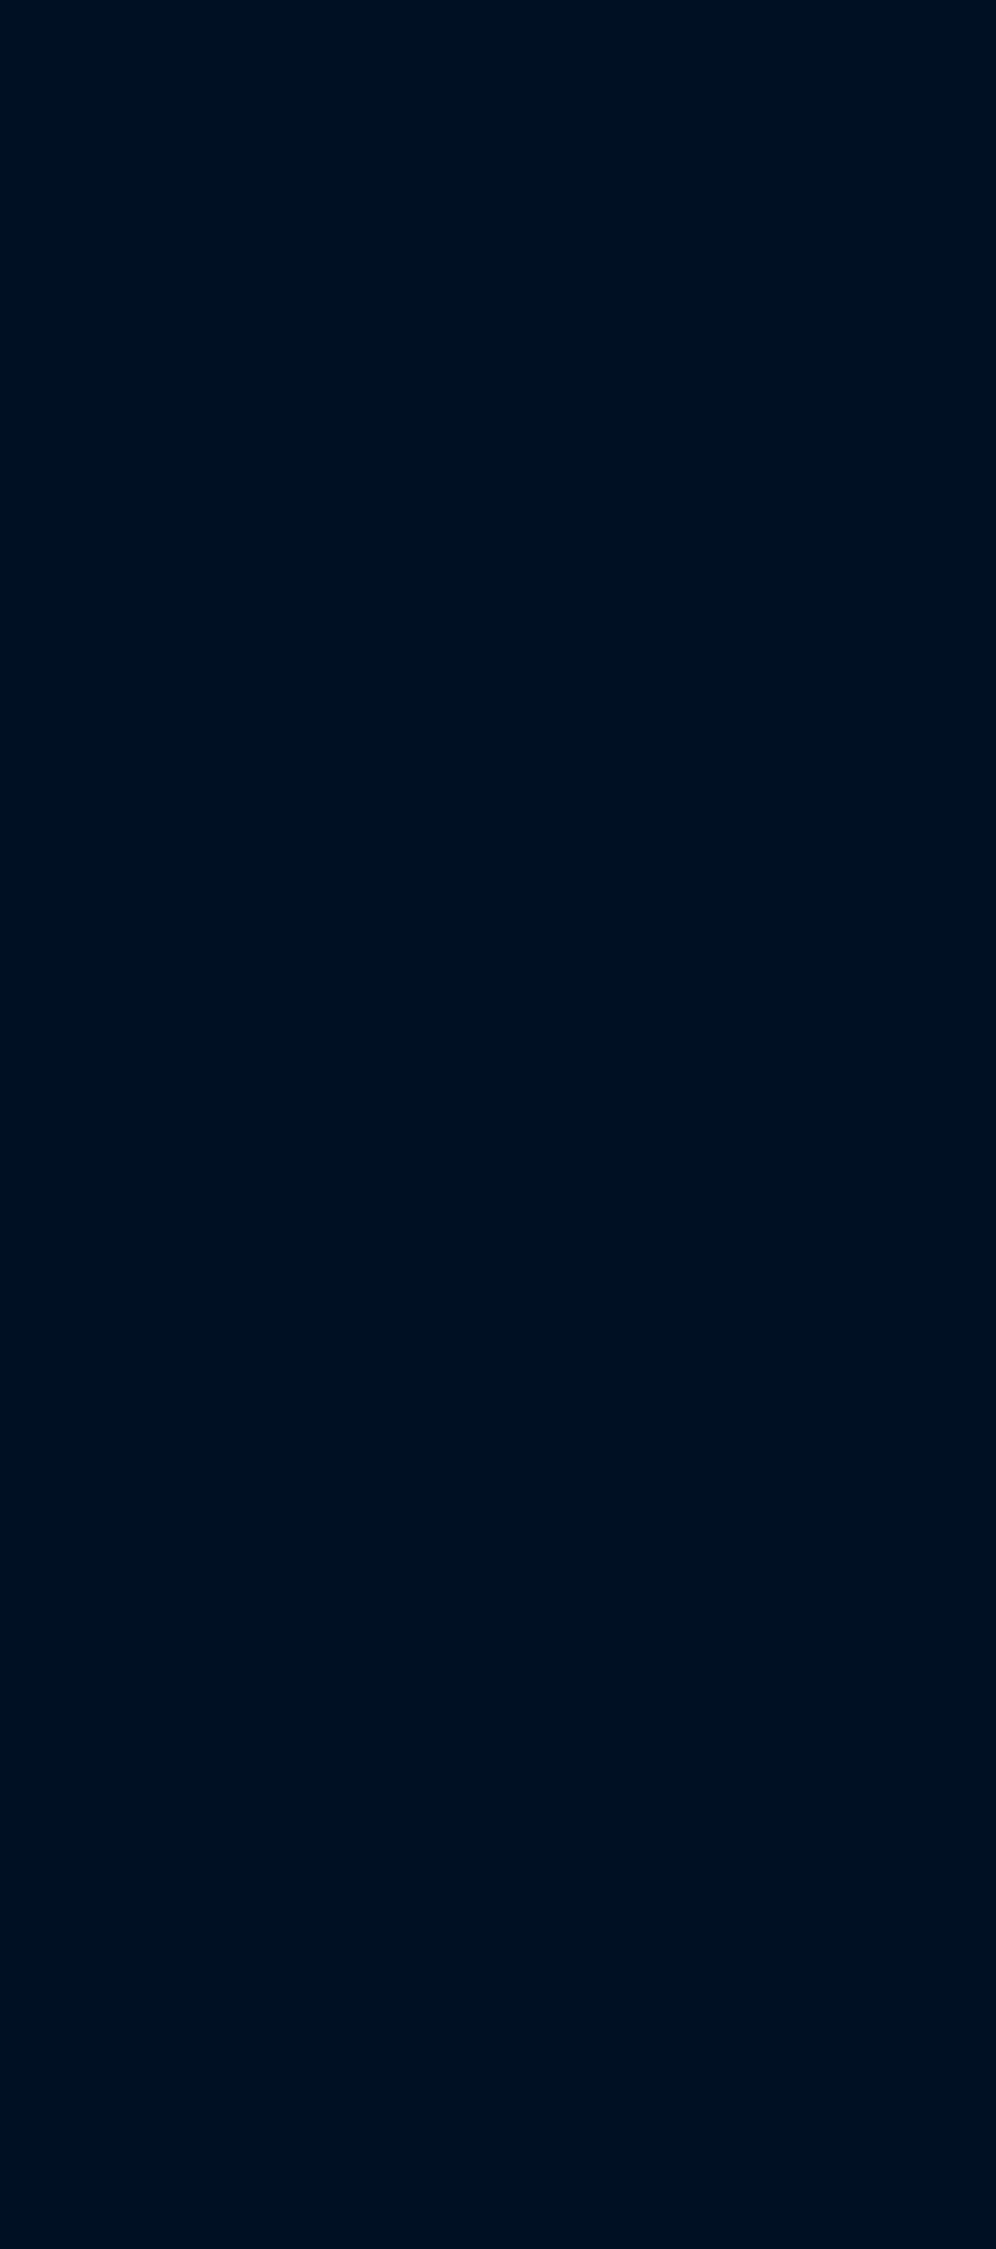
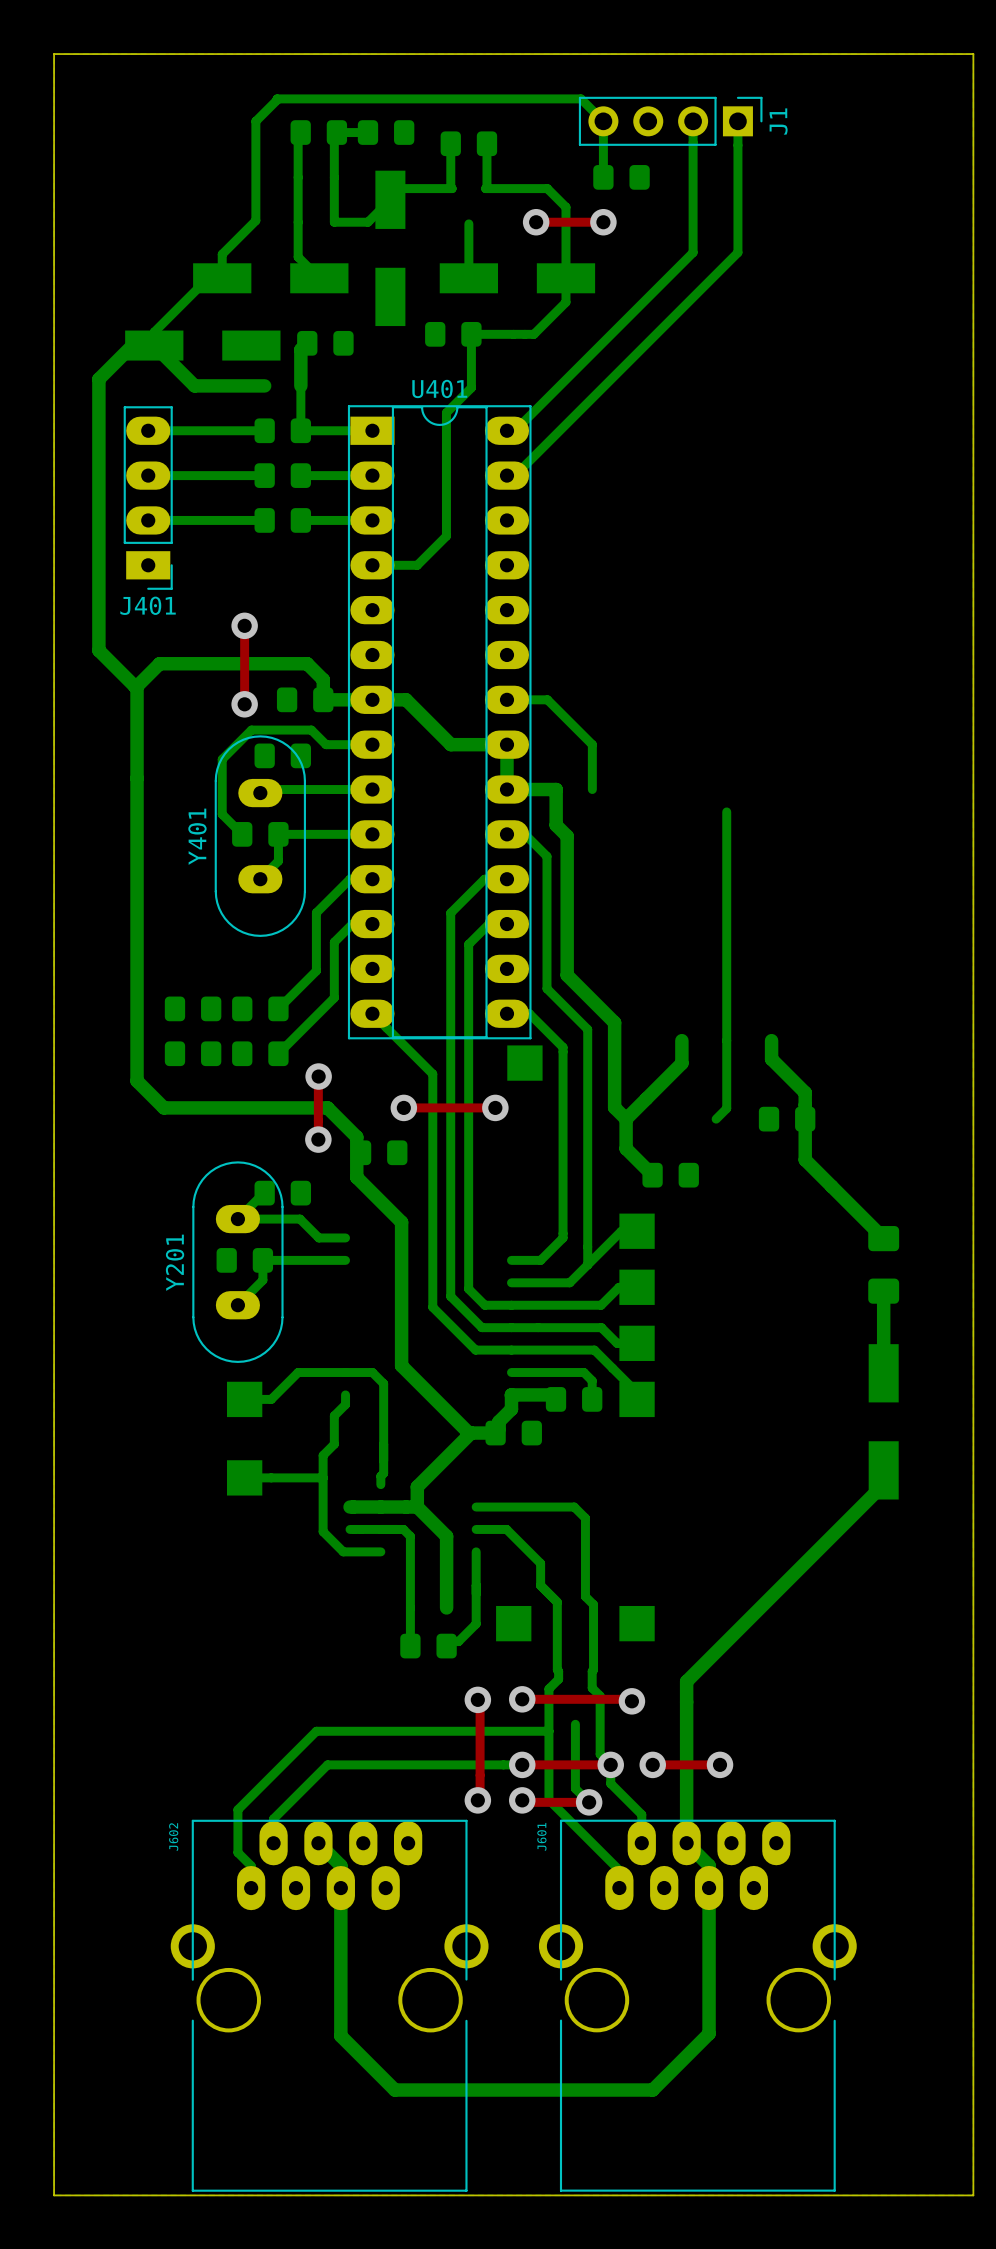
board edge: none -> (54, 54) (973, 54) (973, 2195) (54, 2195) (54, 54)
J1: none -> (670, 121)
bottom track: none -> (693, 121) (693, 252) (514, 430) (506, 430) (502, 426)
bottom track: none -> (737, 121) (737, 252) (514, 475) (506, 475)
bottom track: none -> (300, 132) (298, 135) (298, 257) (319, 278)
part: none -> (318, 132)
bottom track: none -> (367, 132) (336, 132) (334, 135) (334, 222) (367, 222) (401, 188) (452, 188) (450, 143)
part: none -> (386, 132)
part: none -> (468, 143)
bottom track: none -> (486, 143) (485, 188) (547, 188) (565, 207) (565, 302) (533, 334) (471, 334) (471, 387) (446, 412) (446, 536) (417, 565) (372, 565)
bottom track: none -> (603, 177) (603, 121) (580, 98) (277, 98) (255, 121) (255, 220) (222, 254) (222, 278) (208, 278) (154, 332) (154, 345)
part: none -> (621, 177)
top track: none -> (536, 222) (603, 222)
via: none -> (536, 222)
via: none -> (603, 222)
bottom track: none -> (468, 223) (468, 278)
part: none -> (390, 248)
part: none -> (270, 278)
part: none -> (517, 278)
part: none -> (453, 334)
bottom track: none -> (307, 343) (300, 349) (300, 430) (372, 430)
part: none -> (325, 343)
bottom track: none -> (154, 345) (194, 385) (264, 385)
bottom track: none -> (154, 345) (132, 345) (98, 379) (98, 650) (134, 686) (137, 686)
part: none -> (202, 345)
bottom track: none -> (148, 430) (264, 430)
part: none -> (282, 430)
bottom track: none -> (148, 475) (264, 475)
part: none -> (282, 475)
bottom track: none -> (300, 475) (372, 475)
J401: none -> (148, 498)
bottom track: none -> (148, 520) (264, 520)
part: none -> (282, 520)
bottom track: none -> (300, 520) (372, 520)
top track: none -> (244, 625) (244, 704)
via: none -> (244, 625)
bottom track: none -> (137, 686) (159, 663) (307, 663) (323, 679) (323, 699) (406, 699) (450, 744) (506, 744) (506, 789) (556, 789) (556, 825) (567, 836) (567, 975) (614, 1022) (614, 1107) (626, 1119)
bottom track: none -> (137, 686) (137, 1081) (163, 1107) (327, 1107) (356, 1137) (356, 1177) (401, 1222) (401, 1365) (468, 1433) (495, 1433) (498, 1429) (498, 1421) (511, 1409) (511, 1394) (556, 1394)
part: none -> (305, 699)
bottom track: none -> (506, 699) (547, 699) (592, 744) (592, 789)
via: none -> (244, 704)
U401: none -> (439, 722)
bottom track: none -> (372, 744) (326, 744) (311, 730) (251, 730) (222, 759) (222, 814) (242, 834)
part: none -> (282, 755)
bottom track: none -> (263, 789) (372, 789)
bottom track: none -> (726, 811) (726, 1108) (716, 1119)
part: none -> (260, 834)
bottom track: none -> (372, 834) (278, 834) (278, 861) (260, 879)
bottom track: none -> (506, 834) (524, 834) (546, 856) (546, 988) (587, 1029) (587, 1264)
Y401: none -> (260, 836)
bottom track: none -> (372, 879) (350, 879) (316, 912) (316, 970) (278, 1008)
bottom track: none -> (506, 879) (484, 879) (450, 913) (450, 1296) (481, 1327) (601, 1327) (617, 1343) (643, 1343)
bottom track: none -> (372, 924) (352, 924) (334, 942) (334, 997) (278, 1053)
bottom track: none -> (506, 924) (489, 924) (468, 944) (468, 1289) (484, 1305) (601, 1305) (619, 1287) (643, 1287)
part: none -> (193, 1008)
part: none -> (260, 1008)
bottom track: none -> (372, 1013) (432, 1074) (432, 1307) (475, 1350) (594, 1350) (643, 1399)
bottom track: none -> (506, 1013) (529, 1013) (563, 1047) (563, 1237) (540, 1260) (511, 1260)
bottom track: none -> (681, 1040) (681, 1063) (626, 1119)
bottom track: none -> (771, 1040) (771, 1059) (805, 1092) (805, 1159) (883, 1238)
part: none -> (193, 1053)
part: none -> (260, 1053)
part: none -> (524, 1063)
top track: none -> (318, 1076) (318, 1139)
via: none -> (318, 1076)
top track: none -> (403, 1107) (495, 1107)
via: none -> (403, 1107)
via: none -> (495, 1107)
bottom track: none -> (626, 1119) (626, 1148) (652, 1175)
part: none -> (787, 1119)
via: none -> (318, 1139)
part: none -> (379, 1152)
part: none -> (670, 1175)
bottom track: none -> (264, 1193) (237, 1219) (300, 1219) (318, 1237) (345, 1237)
part: none -> (282, 1193)
part: none -> (637, 1231)
bottom track: none -> (643, 1231) (621, 1231) (569, 1282) (511, 1282)
part: none -> (244, 1260)
bottom track: none -> (345, 1260) (262, 1260) (262, 1280) (237, 1305)
Y201: none -> (237, 1262)
part: none -> (883, 1264)
part: none -> (637, 1287)
bottom track: none -> (883, 1291) (883, 1373)
part: none -> (637, 1343)
bottom track: none -> (511, 1372) (583, 1372) (592, 1380) (592, 1394)
bottom track: none -> (345, 1394) (345, 1404) (334, 1415) (334, 1444) (323, 1455) (323, 1531) (343, 1551) (380, 1551)
bottom track: none -> (244, 1399) (271, 1399) (298, 1372) (372, 1372) (383, 1383) (383, 1473) (380, 1476) (380, 1484)
part: none -> (244, 1399)
part: none -> (574, 1399)
part: none -> (637, 1399)
part: none -> (883, 1421)
bottom track: none -> (471, 1433) (417, 1486) (417, 1507)
part: none -> (513, 1433)
bottom track: none -> (883, 1470) (883, 1484) (686, 1681) (686, 1843) (709, 1865) (709, 2033) (652, 2090) (394, 2090) (340, 2036) (340, 1865) (318, 1843)
bottom track: none -> (244, 1477) (323, 1477)
part: none -> (244, 1477)
bottom track: none -> (350, 1507) (417, 1507)
bottom track: none -> (417, 1507) (446, 1536) (446, 1607)
bottom track: none -> (476, 1507) (574, 1507) (585, 1518) (585, 1596) (593, 1604) (592, 1688) (600, 1696) (600, 1754) (610, 1764)
bottom track: none -> (350, 1529) (403, 1529) (410, 1536) (410, 1641)
bottom track: none -> (476, 1529) (506, 1529) (540, 1563) (540, 1585) (557, 1602) (558, 1679) (548, 1688) (548, 1799) (619, 1870) (619, 1888)
bottom track: none -> (476, 1551) (476, 1623) (458, 1641) (446, 1641)
part: none -> (513, 1623)
part: none -> (637, 1623)
part: none -> (428, 1646)
top track: none -> (477, 1695) (480, 1697) (480, 1794)
via: none -> (477, 1699)
top track: none -> (522, 1699) (629, 1699) (631, 1701)
via: none -> (522, 1699)
via: none -> (631, 1701)
bottom track: none -> (575, 1724) (575, 1788) (589, 1802)
bottom track: none -> (548, 1731) (316, 1731) (237, 1809) (237, 1852) (251, 1865) (251, 1888)
bottom track: none -> (610, 1761) (610, 1783) (641, 1814) (641, 1843)
bottom track: none -> (522, 1764) (327, 1764) (273, 1818) (273, 1843)
top track: none -> (522, 1764) (610, 1764)
via: none -> (522, 1764)
via: none -> (610, 1764)
top track: none -> (652, 1764) (720, 1764)
via: none -> (652, 1764)
via: none -> (720, 1764)
via: none -> (477, 1800)
top track: none -> (522, 1800) (524, 1802) (589, 1802)
via: none -> (522, 1800)
via: none -> (589, 1802)
J602: none -> (329, 2005)
J601: none -> (697, 2005)

